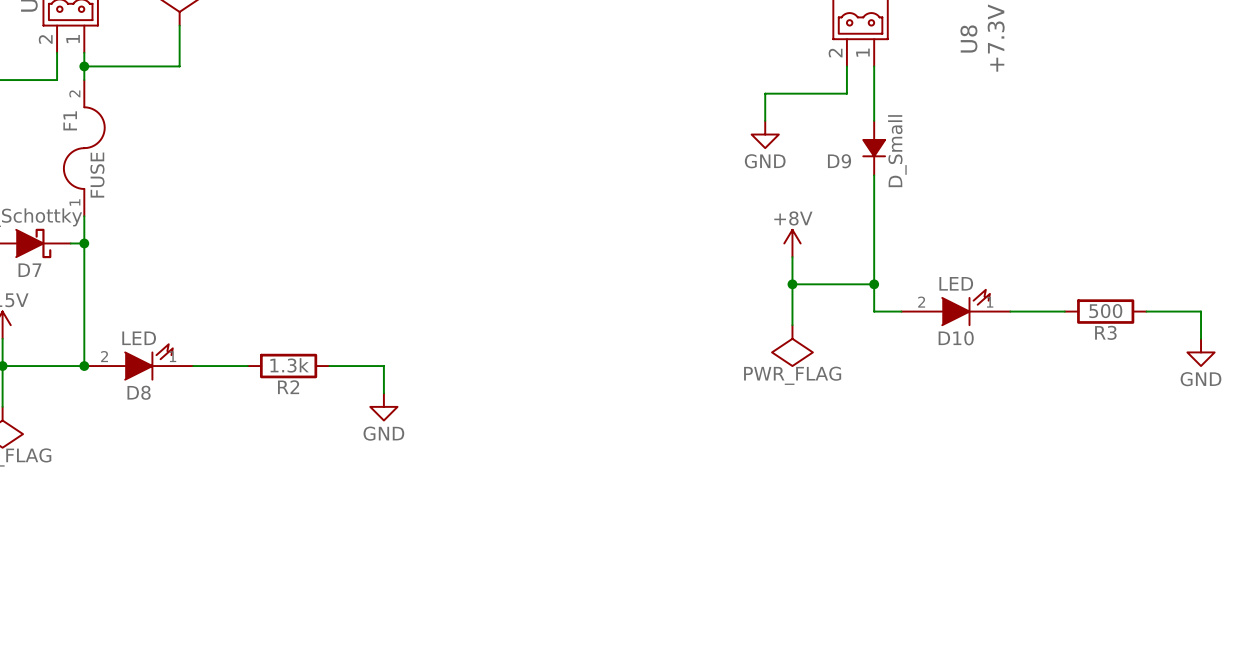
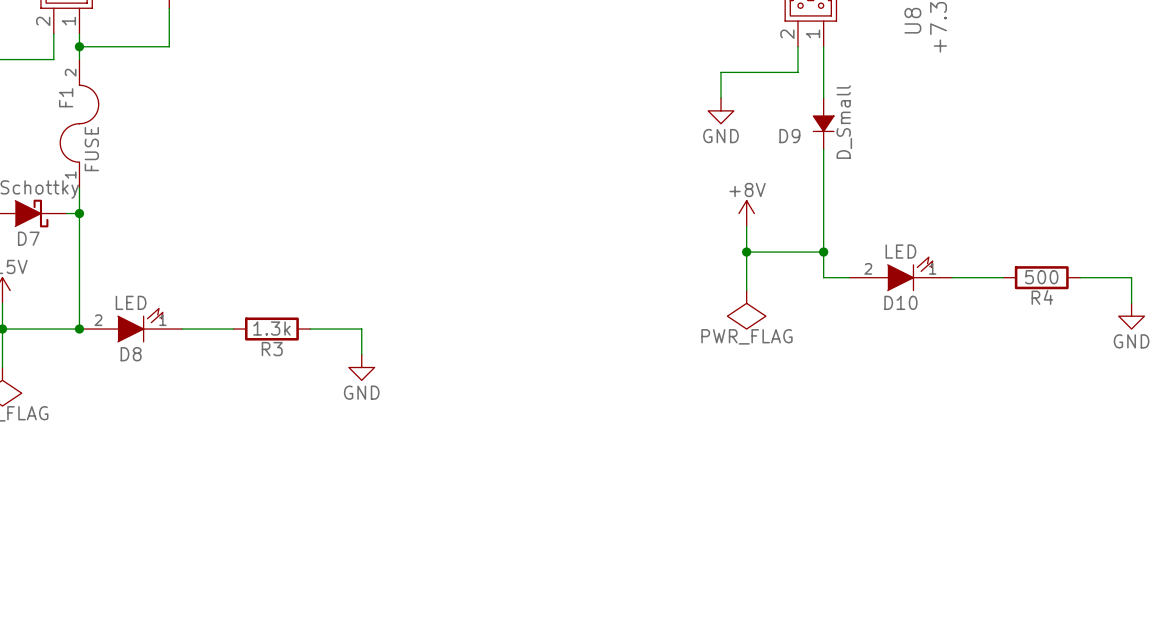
R3 name: R3 (1105, 332) -> R4 (1042, 297)
R2 name: R2 (288, 387) -> R3 (272, 349)

